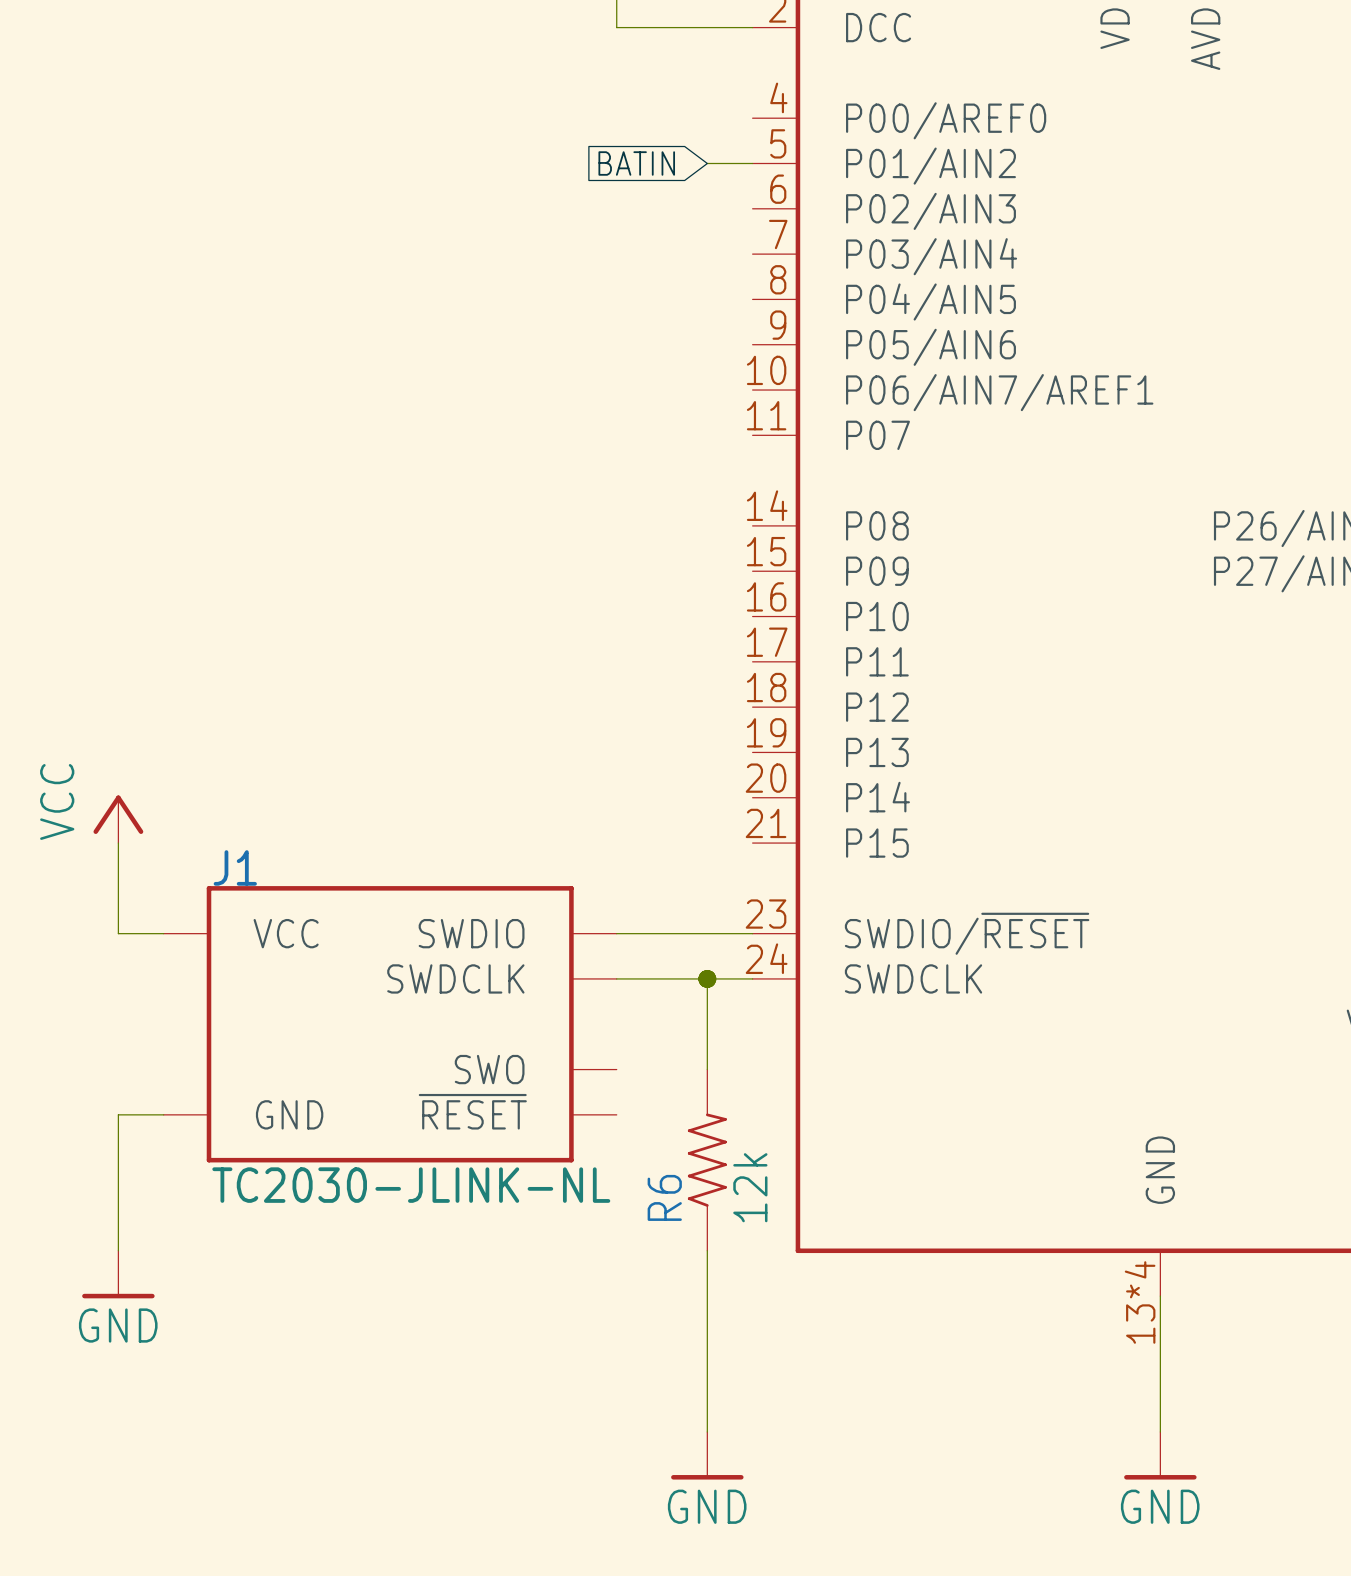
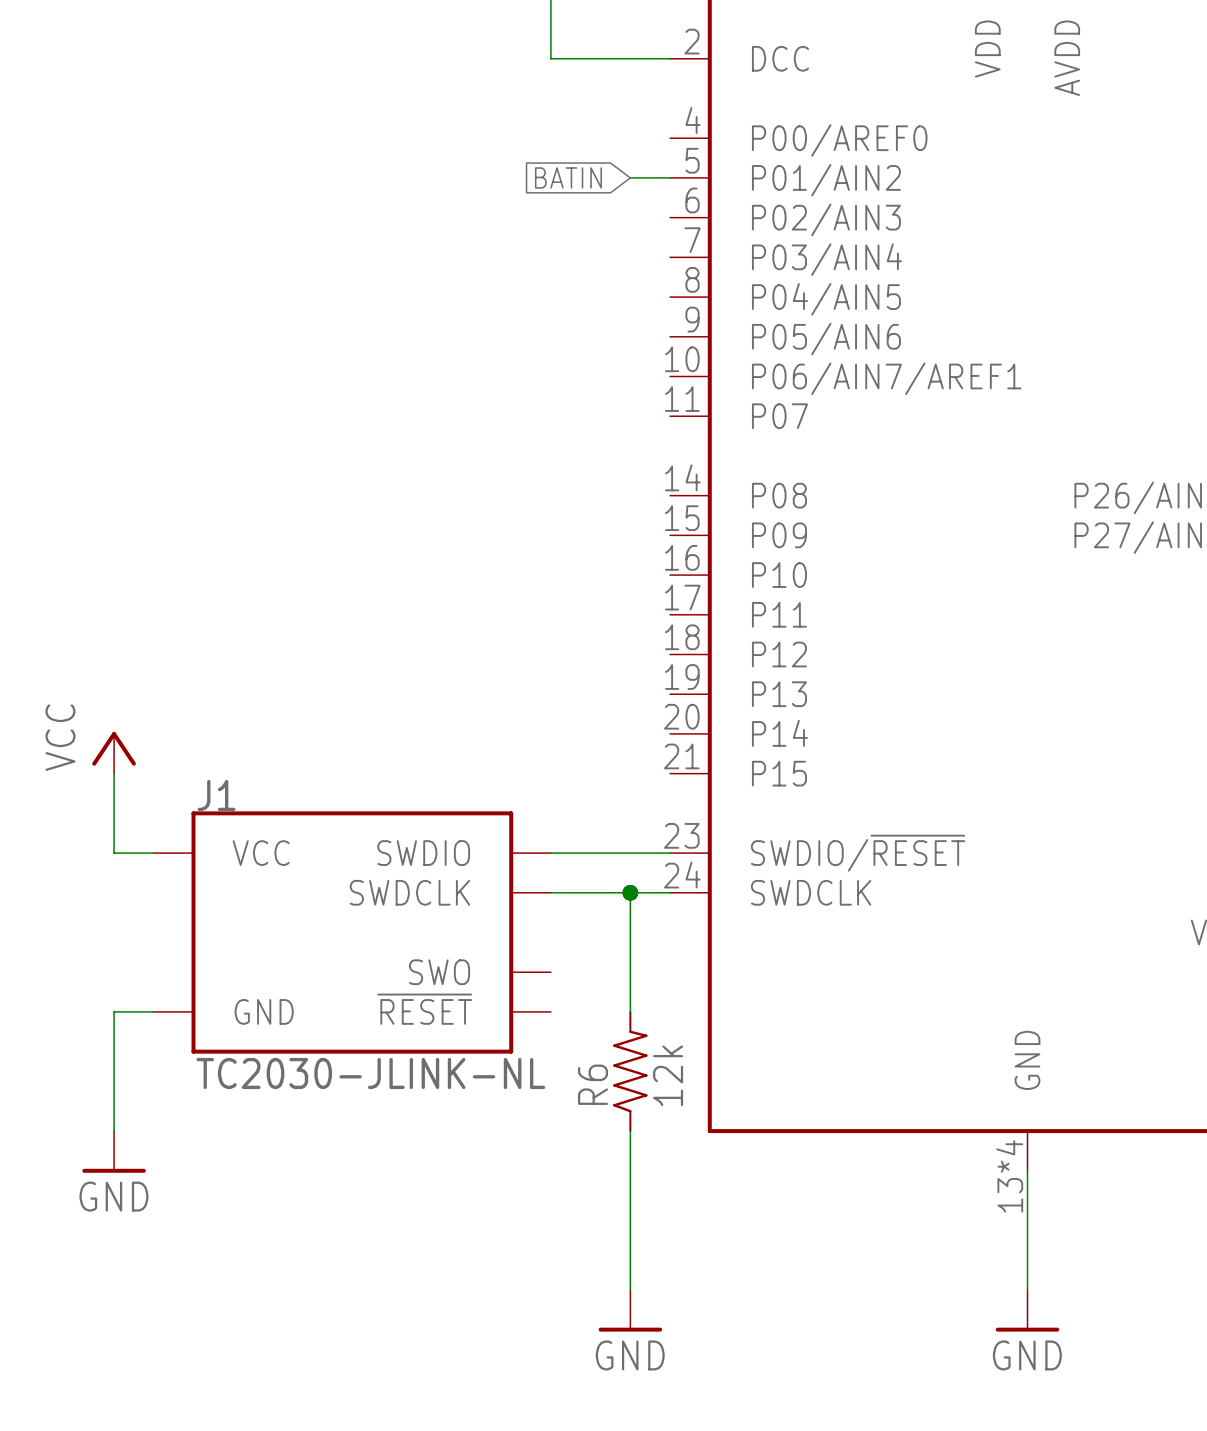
R6 symbol: [687, 1069, 727, 1251] -> [613, 1010, 648, 1133]

